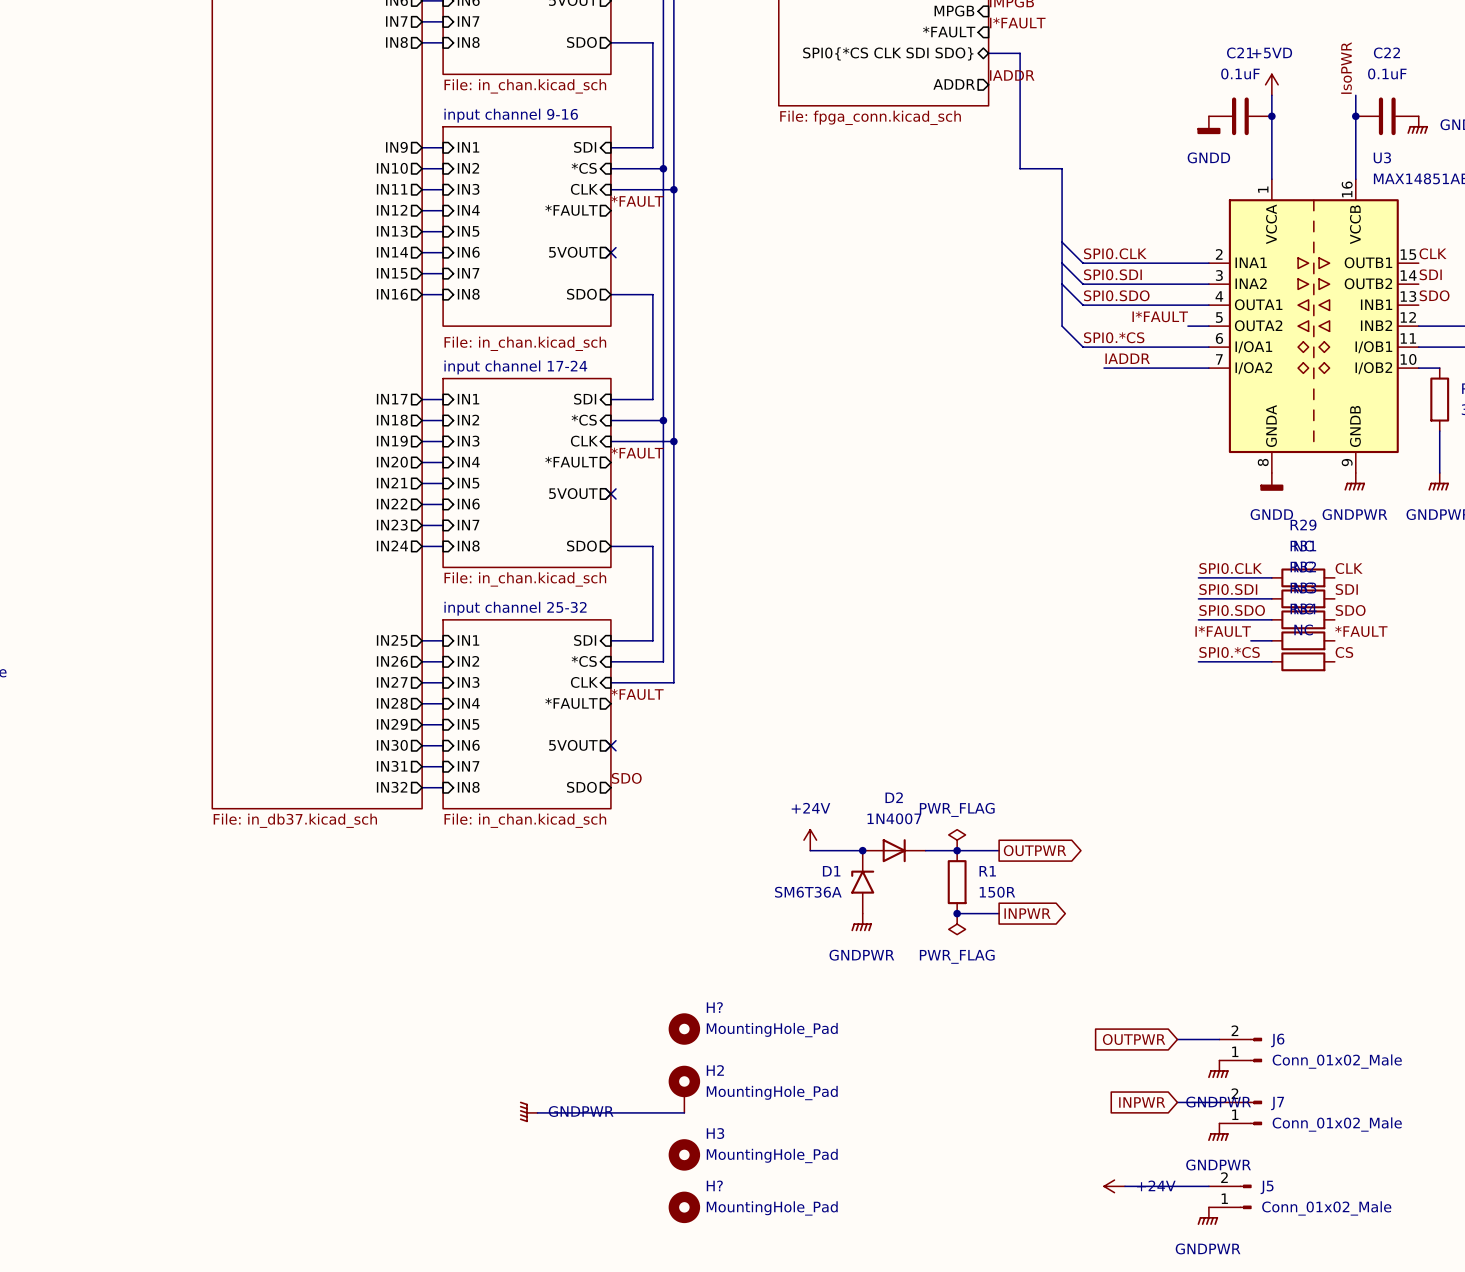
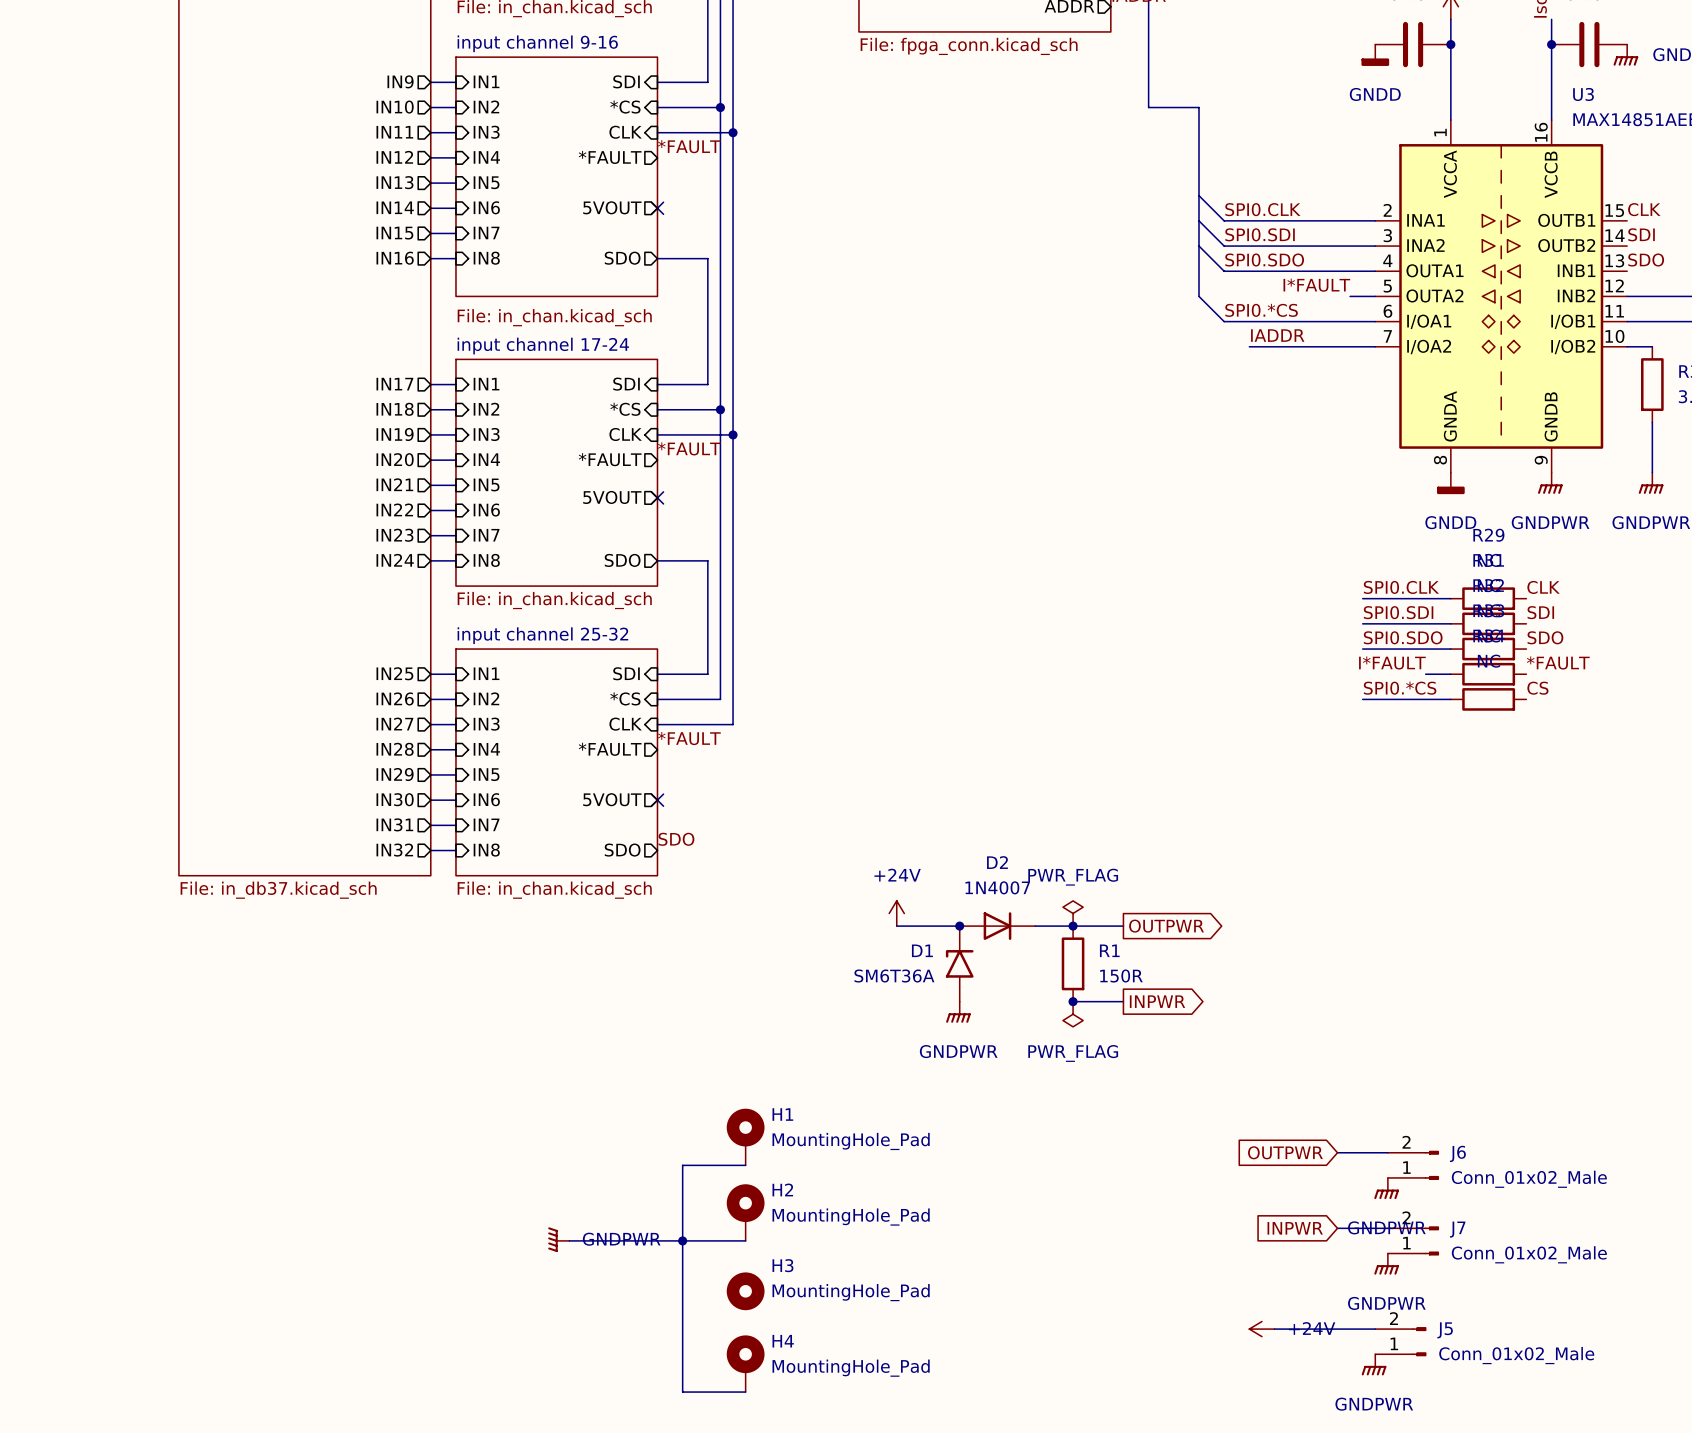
H1: none -> MountingHole_Pad (745, 1137)
H?: MountingHole_Pad (684, 1029) -> none
wire: none -> (745, 1165) (682, 1165) (682, 1392) (745, 1392)
junction: none -> (682, 1240)
H?: MountingHole_Pad (684, 1207) -> none
H4: none -> MountingHole_Pad (745, 1363)

